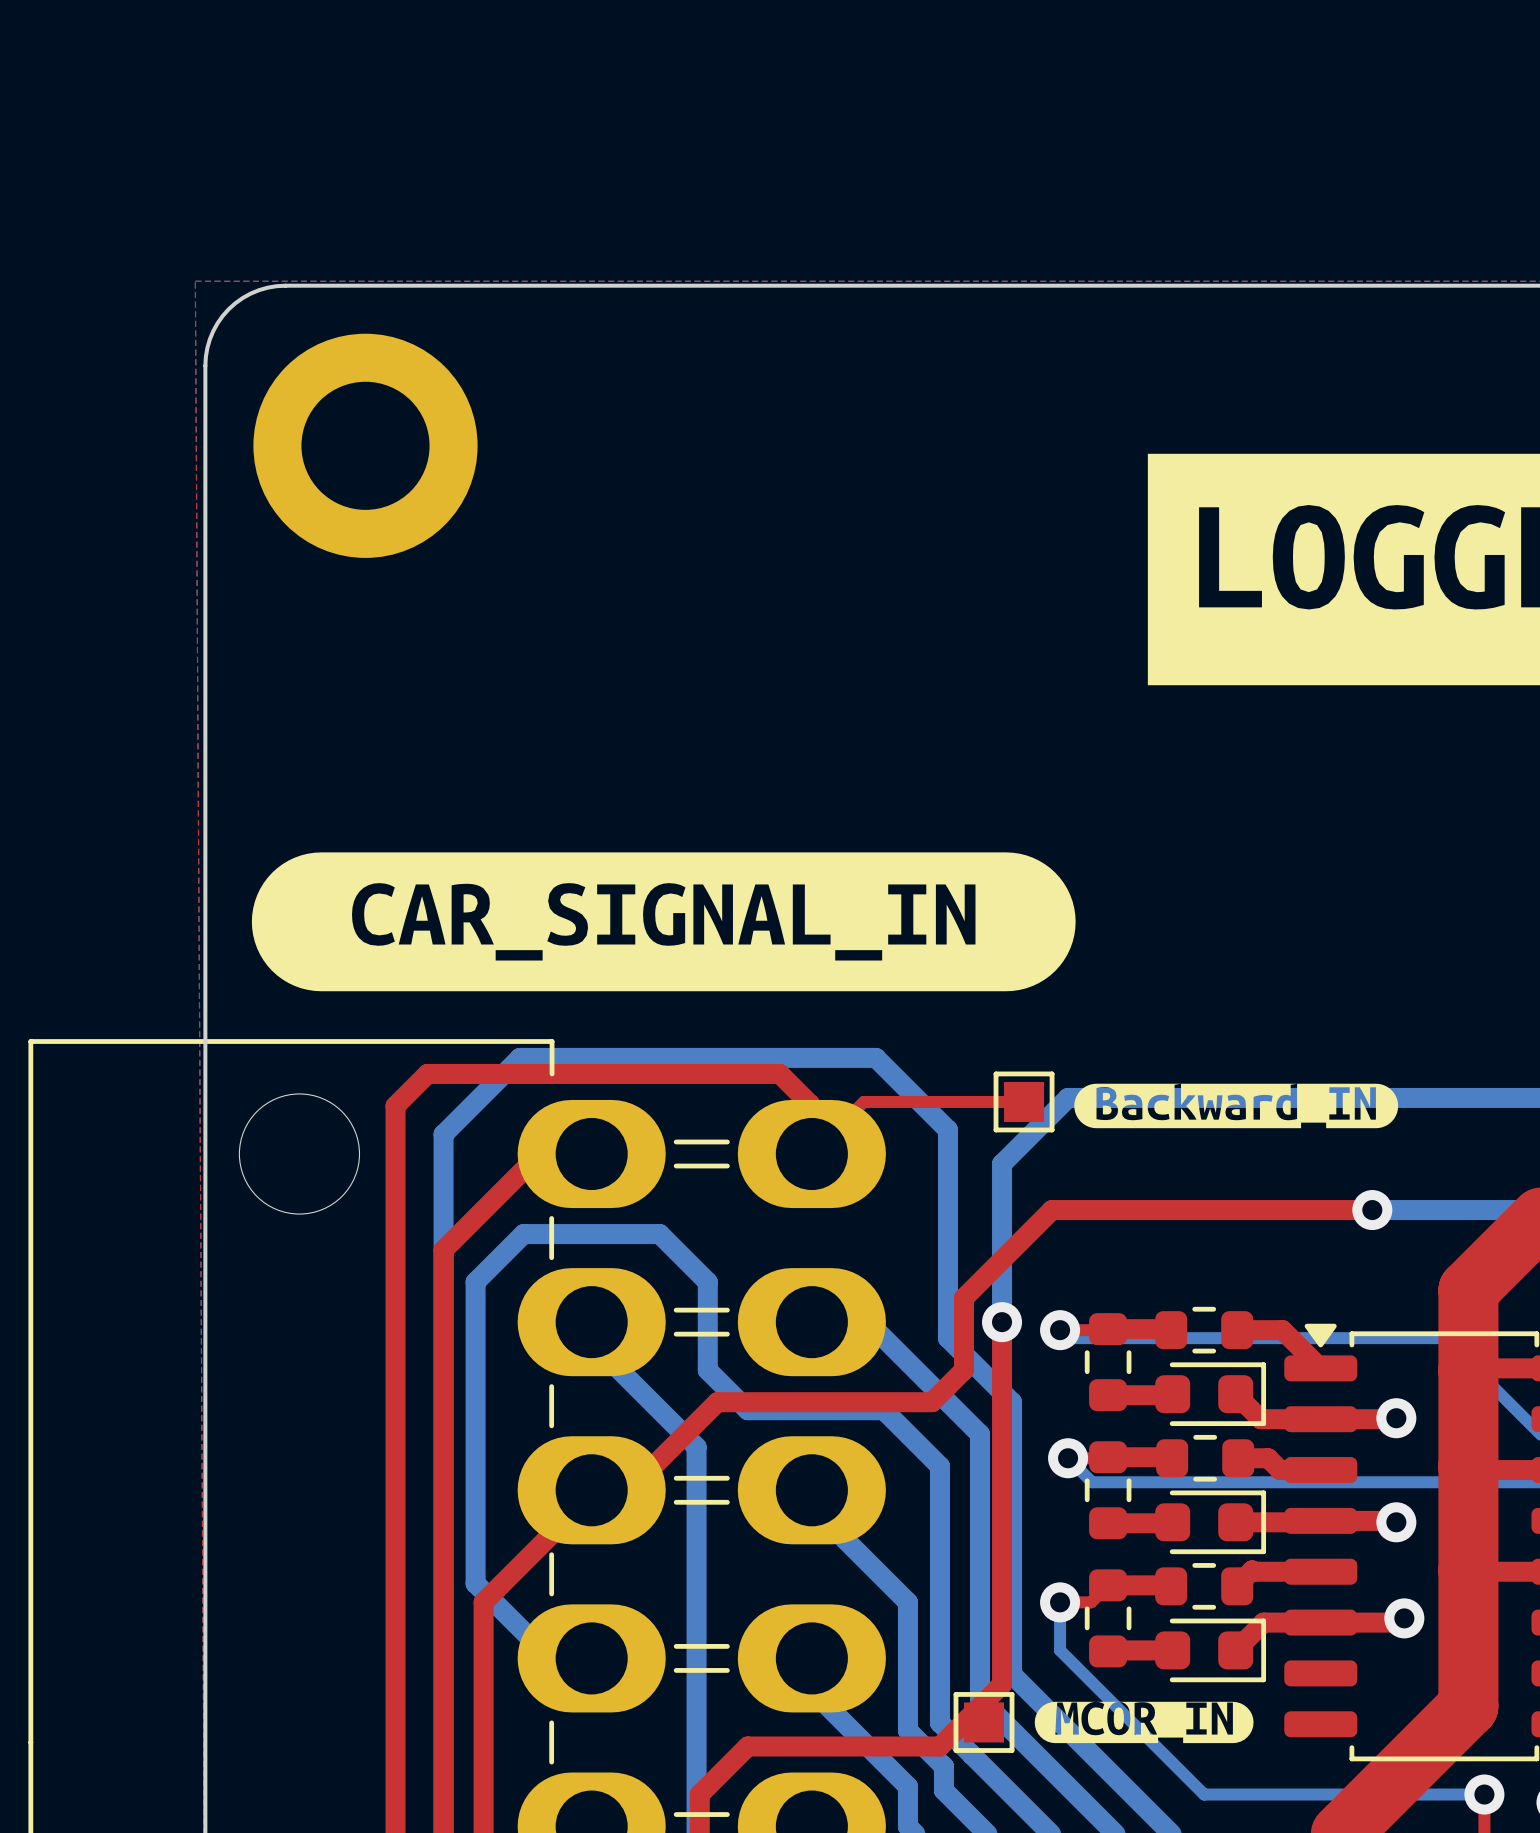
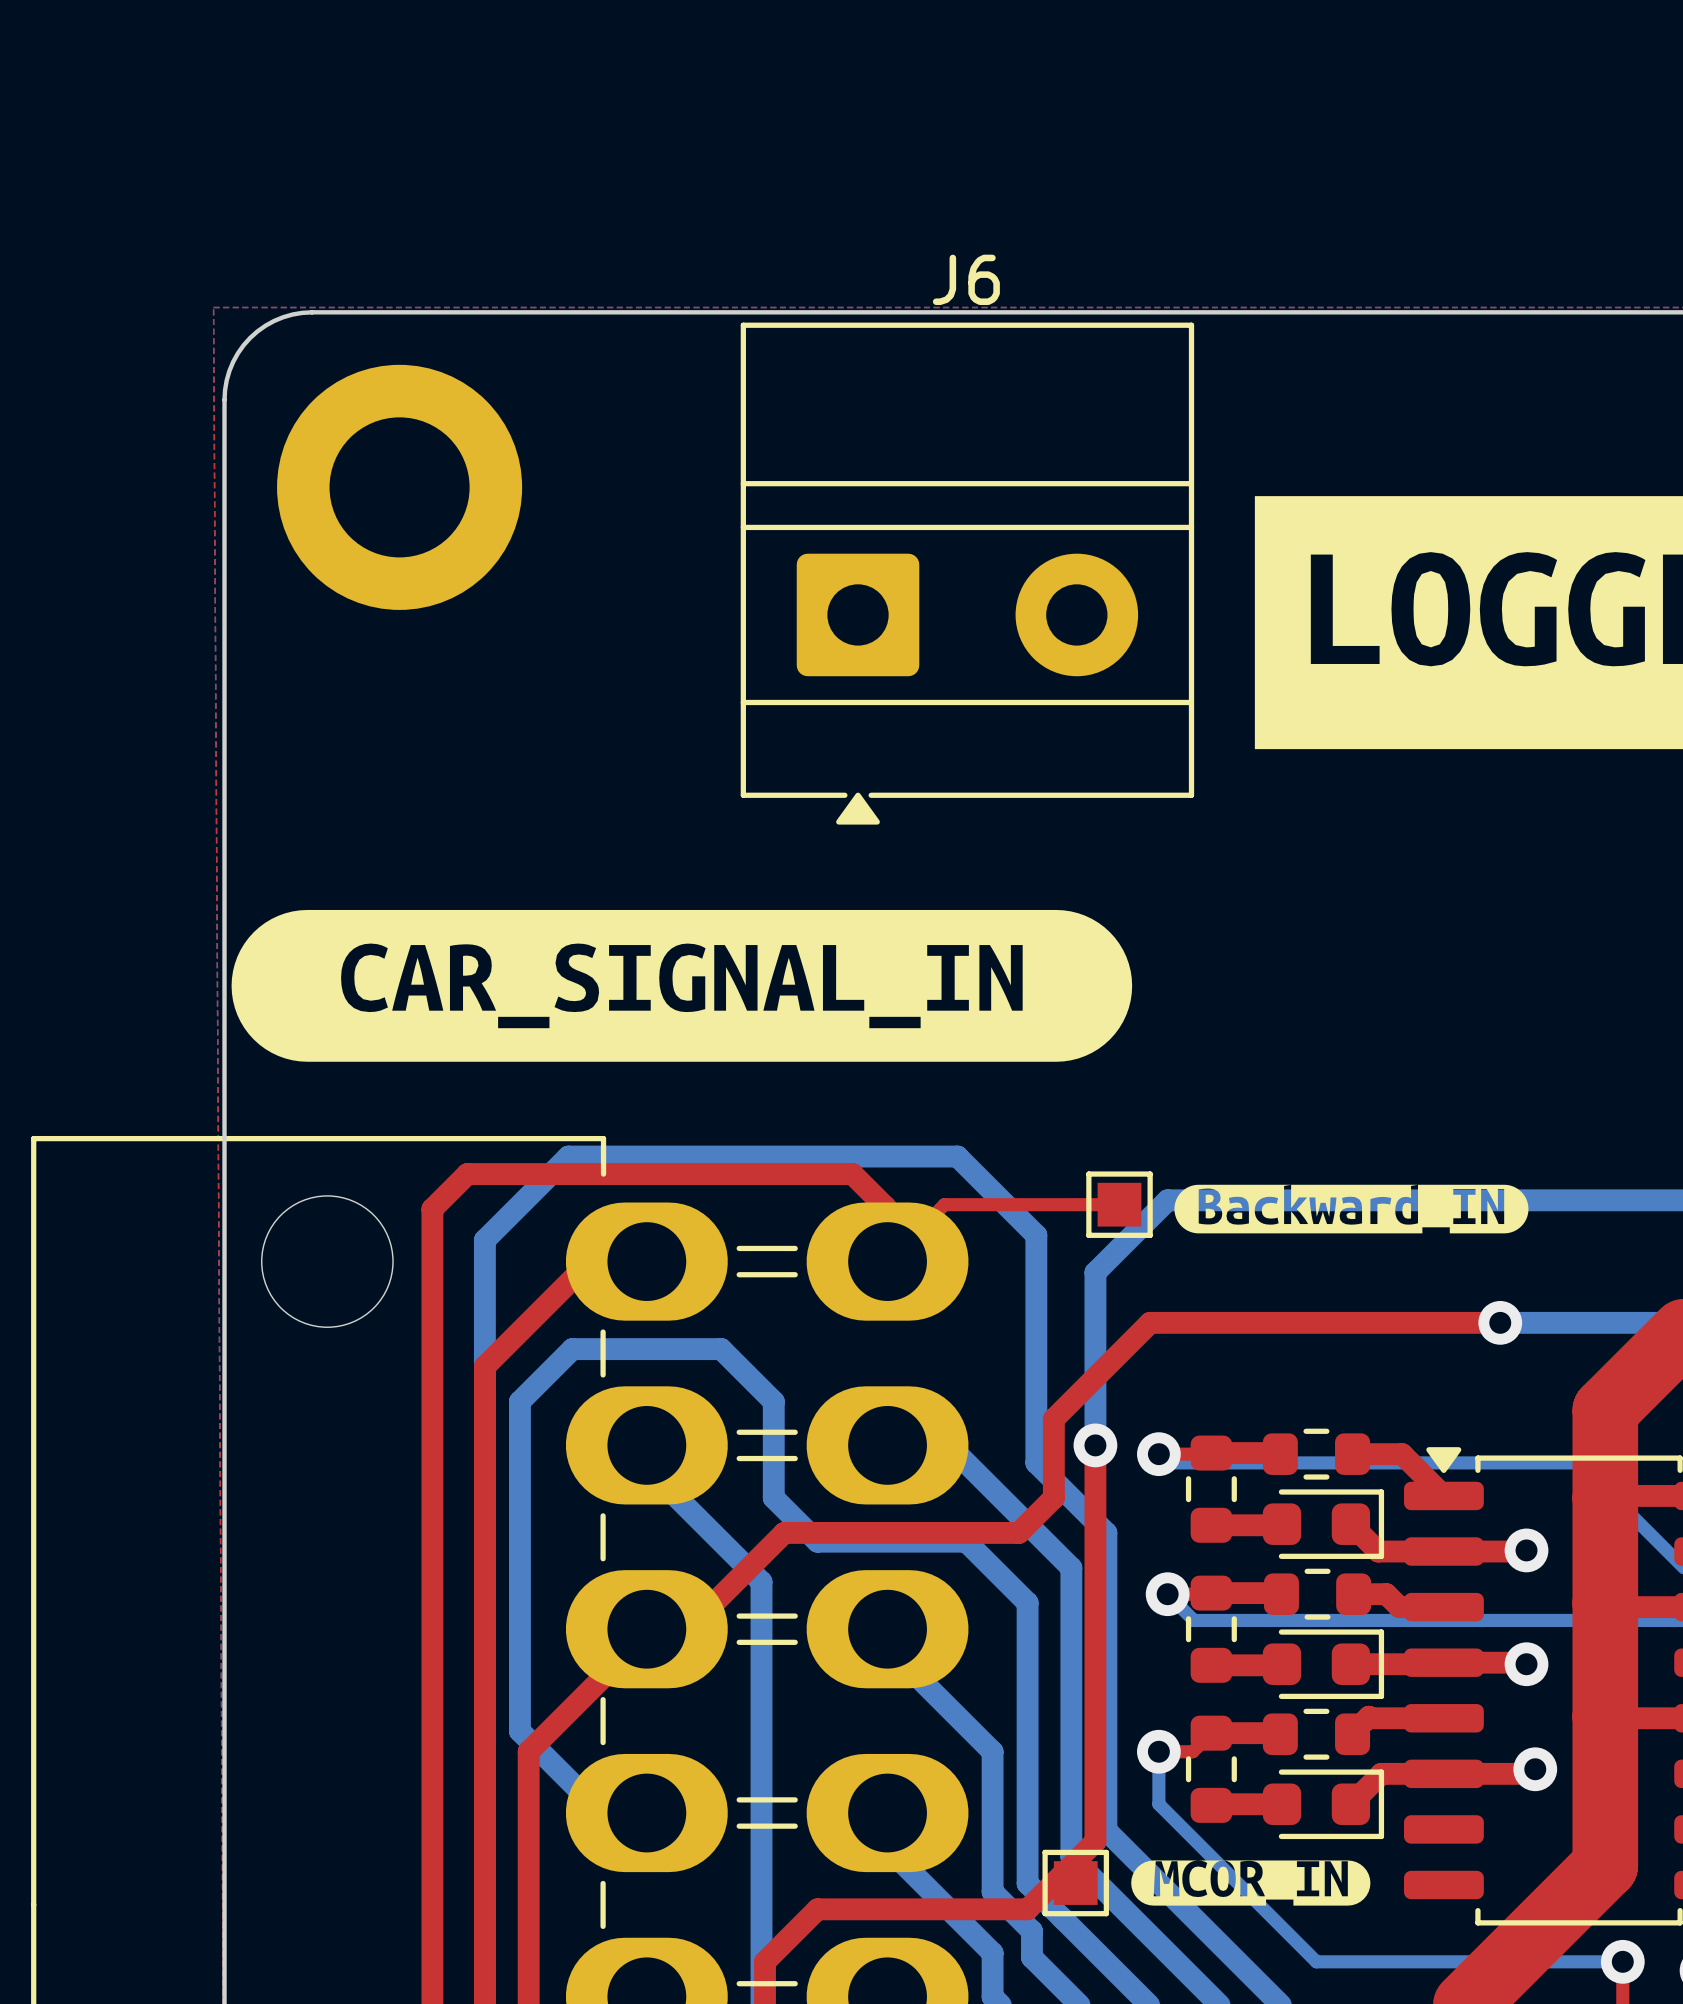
J6: none -> (967, 573)
drawing position: (663, 921) -> (681, 985)

